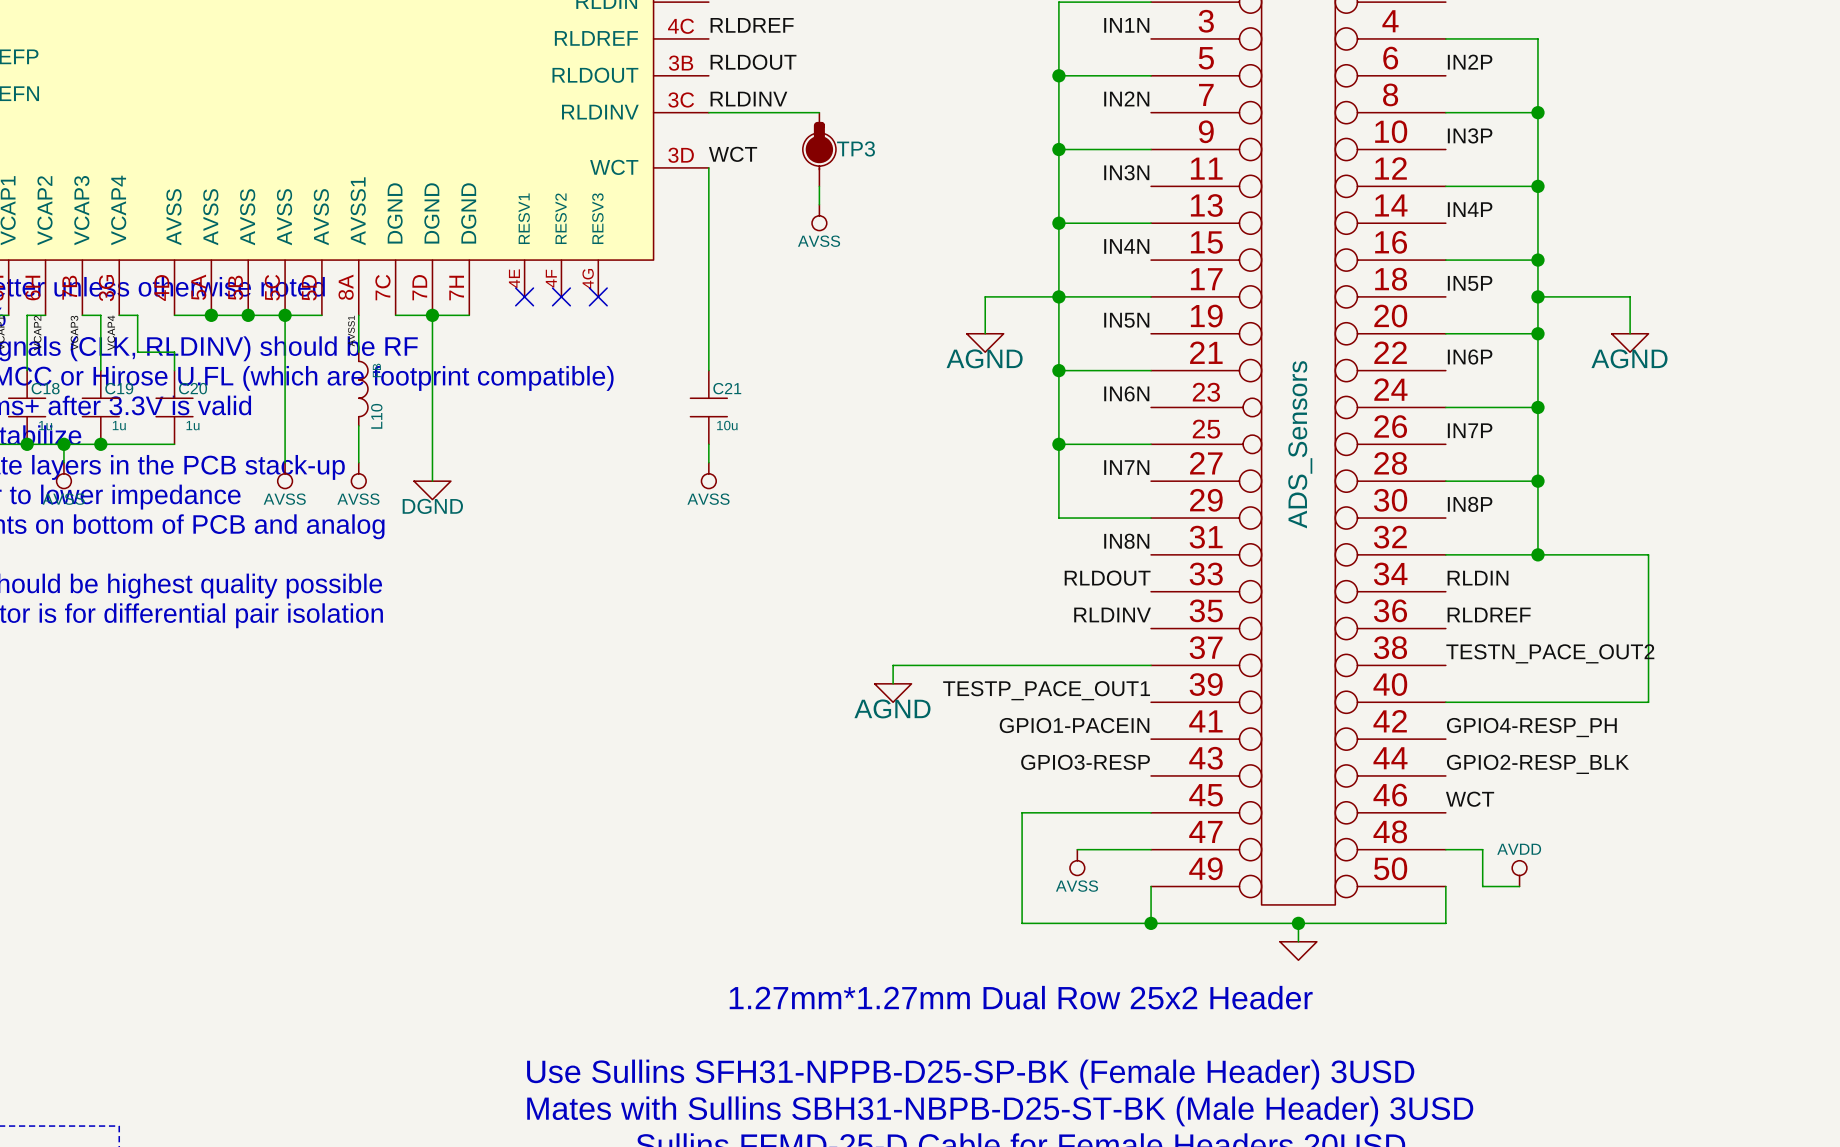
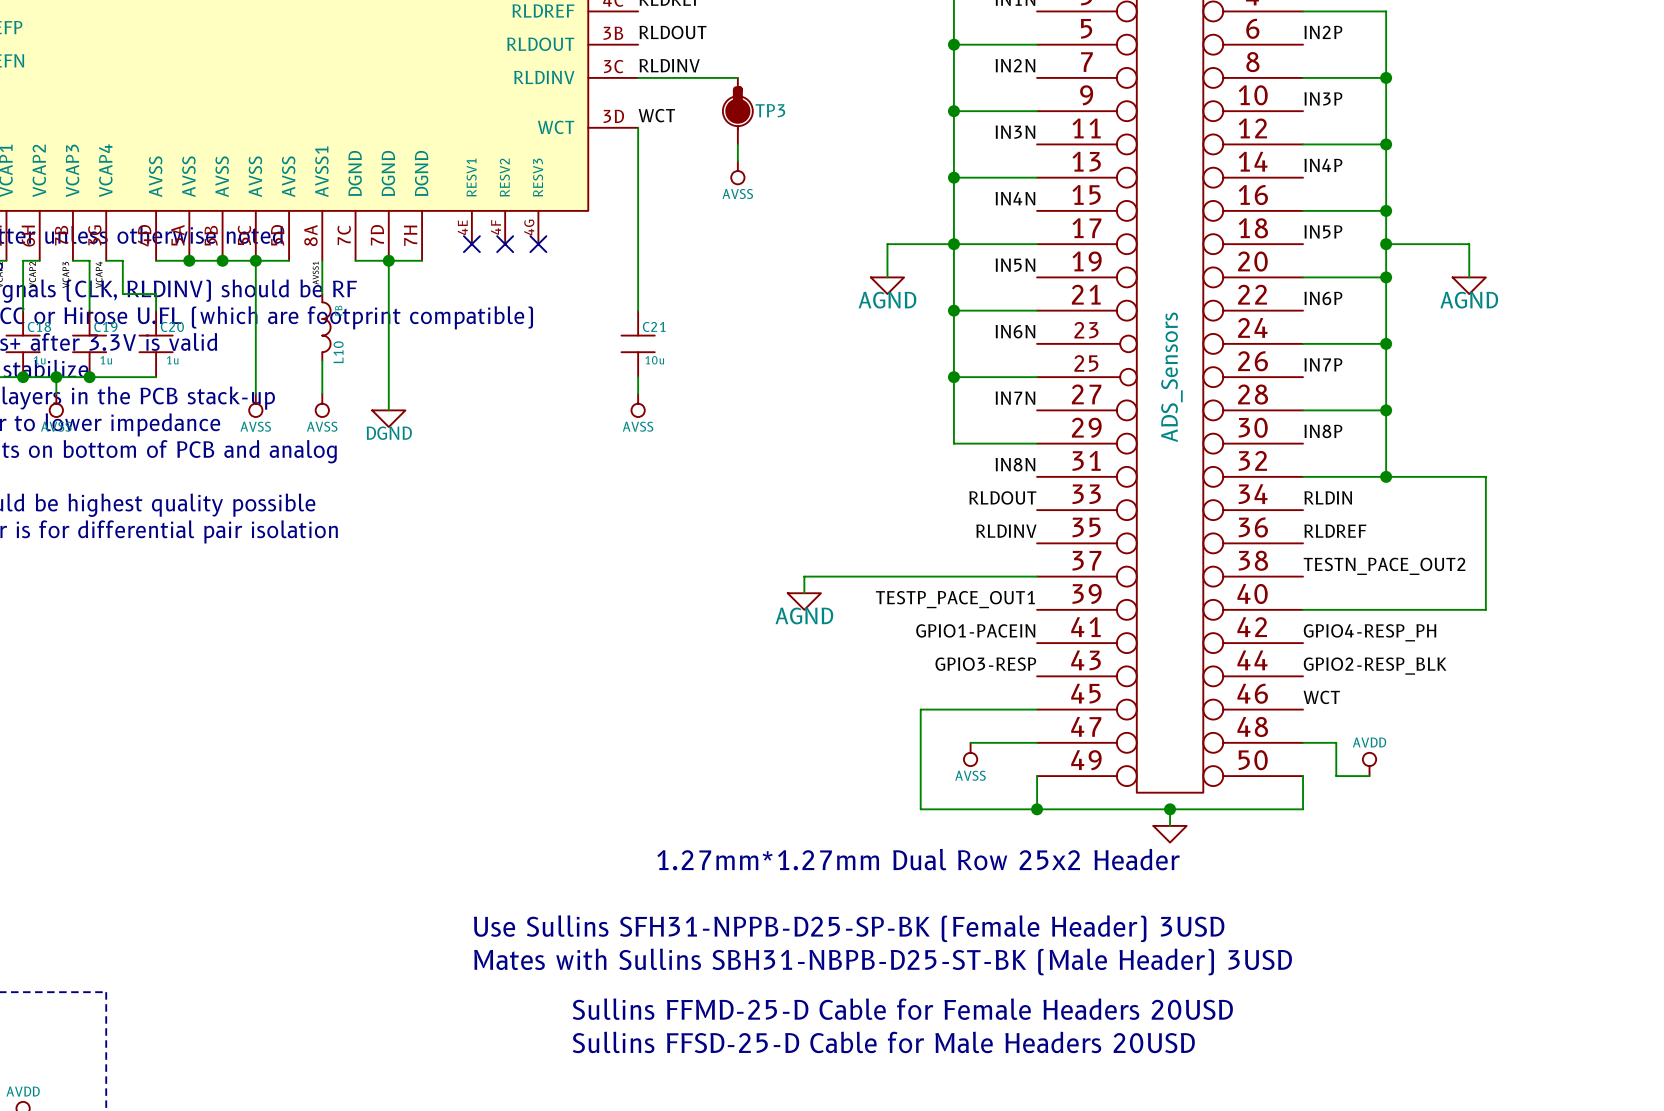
text position: 1.27mm*1.27mm Dual Row 25x2 Header (1021, 997) -> 1.27mm*1.27mm Dual Row 25x2 Header (918, 859)
text position: Use Sullins SFH31-NPPB-D25-SP-BK (Female Header) 3USD (970, 1074) -> Use Sullins SFH31-NPPB-D25-SP-BK (Female Header) 3USD (849, 928)
text position: Mates with Sullins SBH31-NBPB-D25-ST-BK (Male Header) 3USD (1000, 1111) -> Mates with Sullins SBH31-NBPB-D25-ST-BK (Male Header) 3USD (883, 961)

